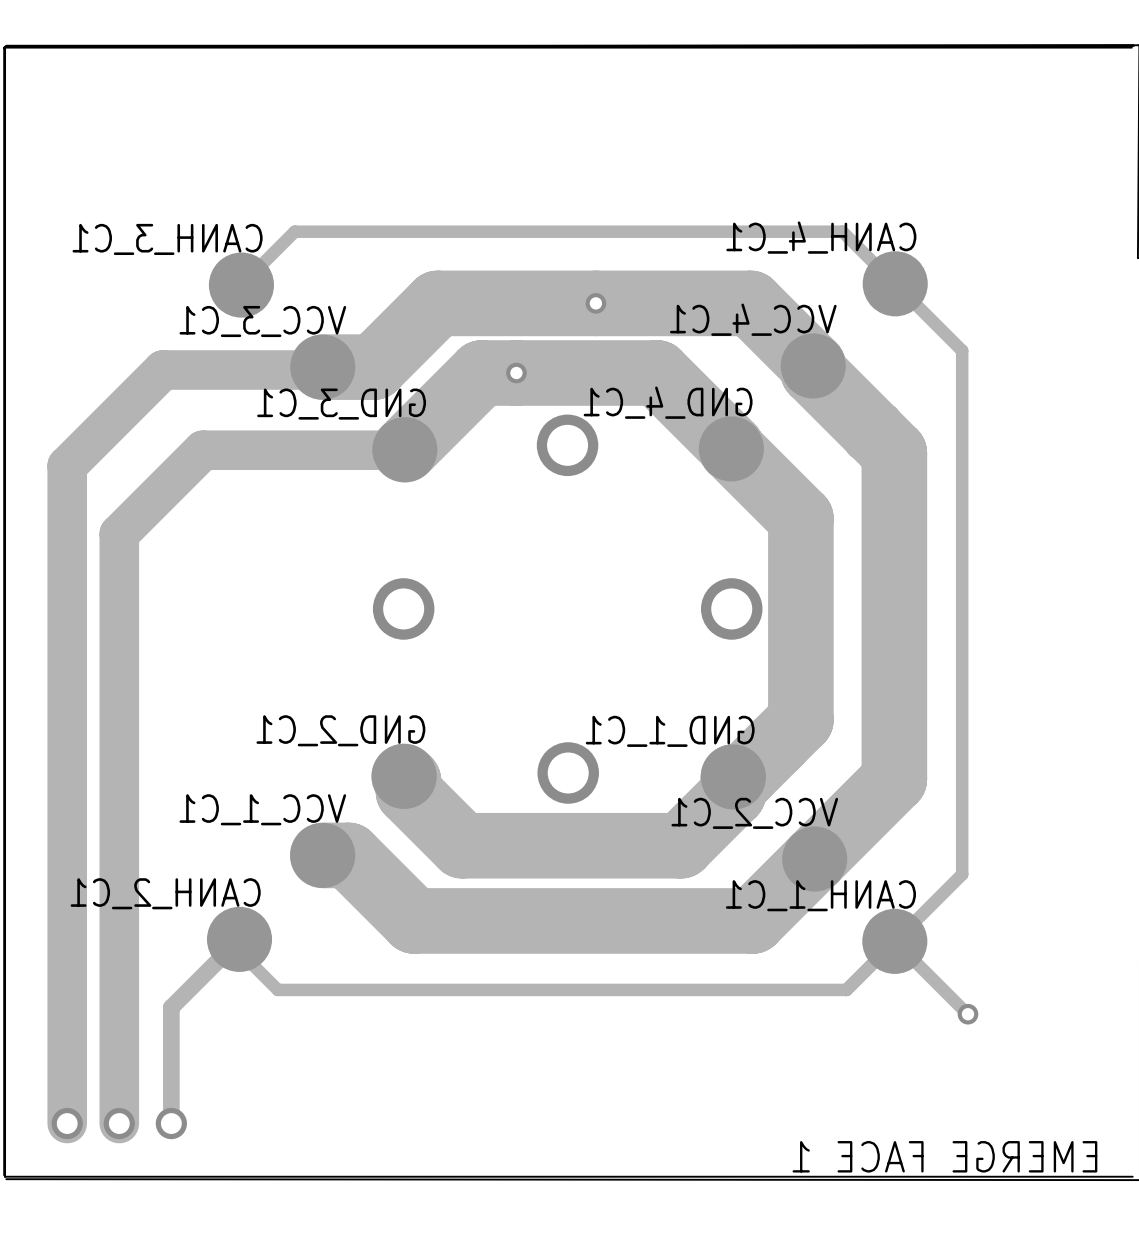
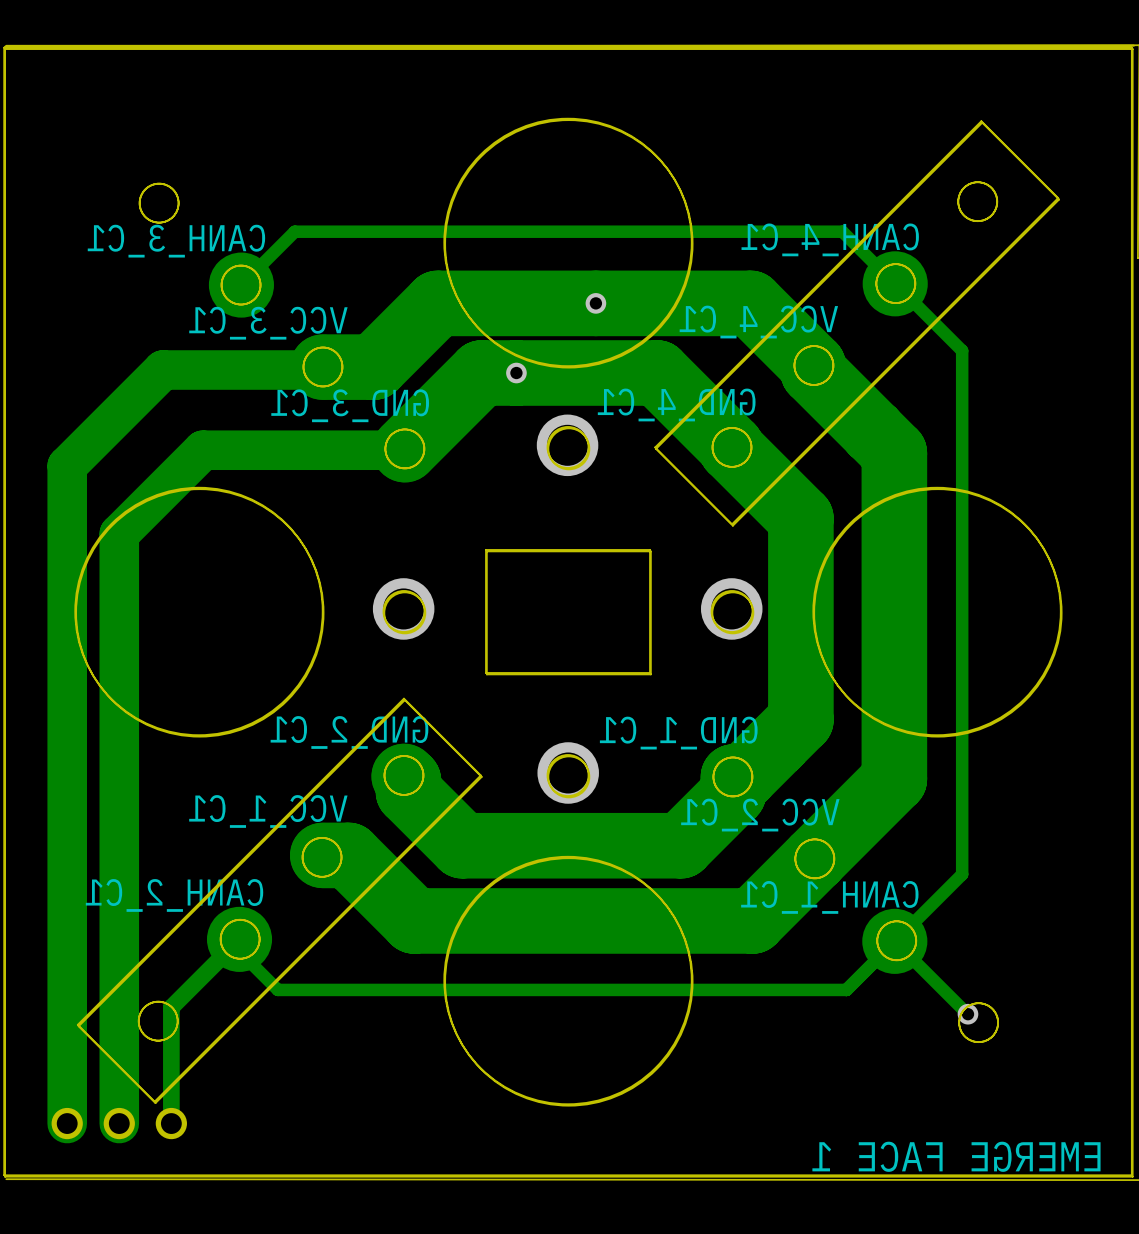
board edge: none -> (1131, 47) (1131, 1175) (4, 1175)
board edge: none -> (5, 49) (1132, 49) (1132, 1176)
round board edge: none -> [444, 118, 692, 367]
round board edge: none -> [445, 120, 693, 368]
board edge: none -> (981, 121) (655, 447) (732, 524) (1058, 198) (981, 121)
board edge: none -> (982, 122) (656, 448) (732, 525) (1059, 199) (982, 122)
round board edge: none -> [958, 182, 998, 222]
round board edge: none -> [139, 183, 179, 223]
round board edge: none -> [876, 264, 916, 304]
round board edge: none -> [221, 265, 261, 305]
round board edge: none -> [794, 346, 834, 385]
round board edge: none -> [303, 347, 343, 387]
round board edge: none -> [547, 426, 589, 468]
round board edge: none -> [712, 427, 752, 467]
round board edge: none -> [548, 428, 590, 470]
round board edge: none -> [385, 429, 425, 469]
round board edge: none -> [75, 487, 323, 736]
round board edge: none -> [813, 487, 1061, 736]
round board edge: none -> [76, 489, 324, 737]
round board edge: none -> [814, 489, 1062, 737]
board edge: none -> (649, 549) (649, 672) (485, 672) (485, 549) (649, 549)
board edge: none -> (650, 551) (650, 674) (486, 674) (486, 551) (650, 551)
round board edge: none -> [383, 590, 425, 632]
round board edge: none -> [711, 590, 753, 632]
round board edge: none -> [384, 592, 426, 634]
round board edge: none -> [712, 592, 754, 634]
board edge: none -> (403, 698) (480, 775) (154, 1101) (77, 1024) (403, 698)
board edge: none -> (404, 700) (78, 1026) (155, 1103) (481, 776) (404, 700)
round board edge: none -> [547, 754, 589, 796]
round board edge: none -> [384, 755, 424, 795]
round board edge: none -> [548, 756, 590, 798]
round board edge: none -> [713, 757, 753, 797]
round board edge: none -> [302, 837, 342, 877]
round board edge: none -> [795, 839, 835, 879]
round board edge: none -> [444, 856, 692, 1105]
round board edge: none -> [445, 858, 693, 1106]
round board edge: none -> [220, 919, 260, 959]
round board edge: none -> [877, 921, 917, 961]
round board edge: none -> [138, 1001, 178, 1041]
round board edge: none -> [959, 1003, 999, 1043]

